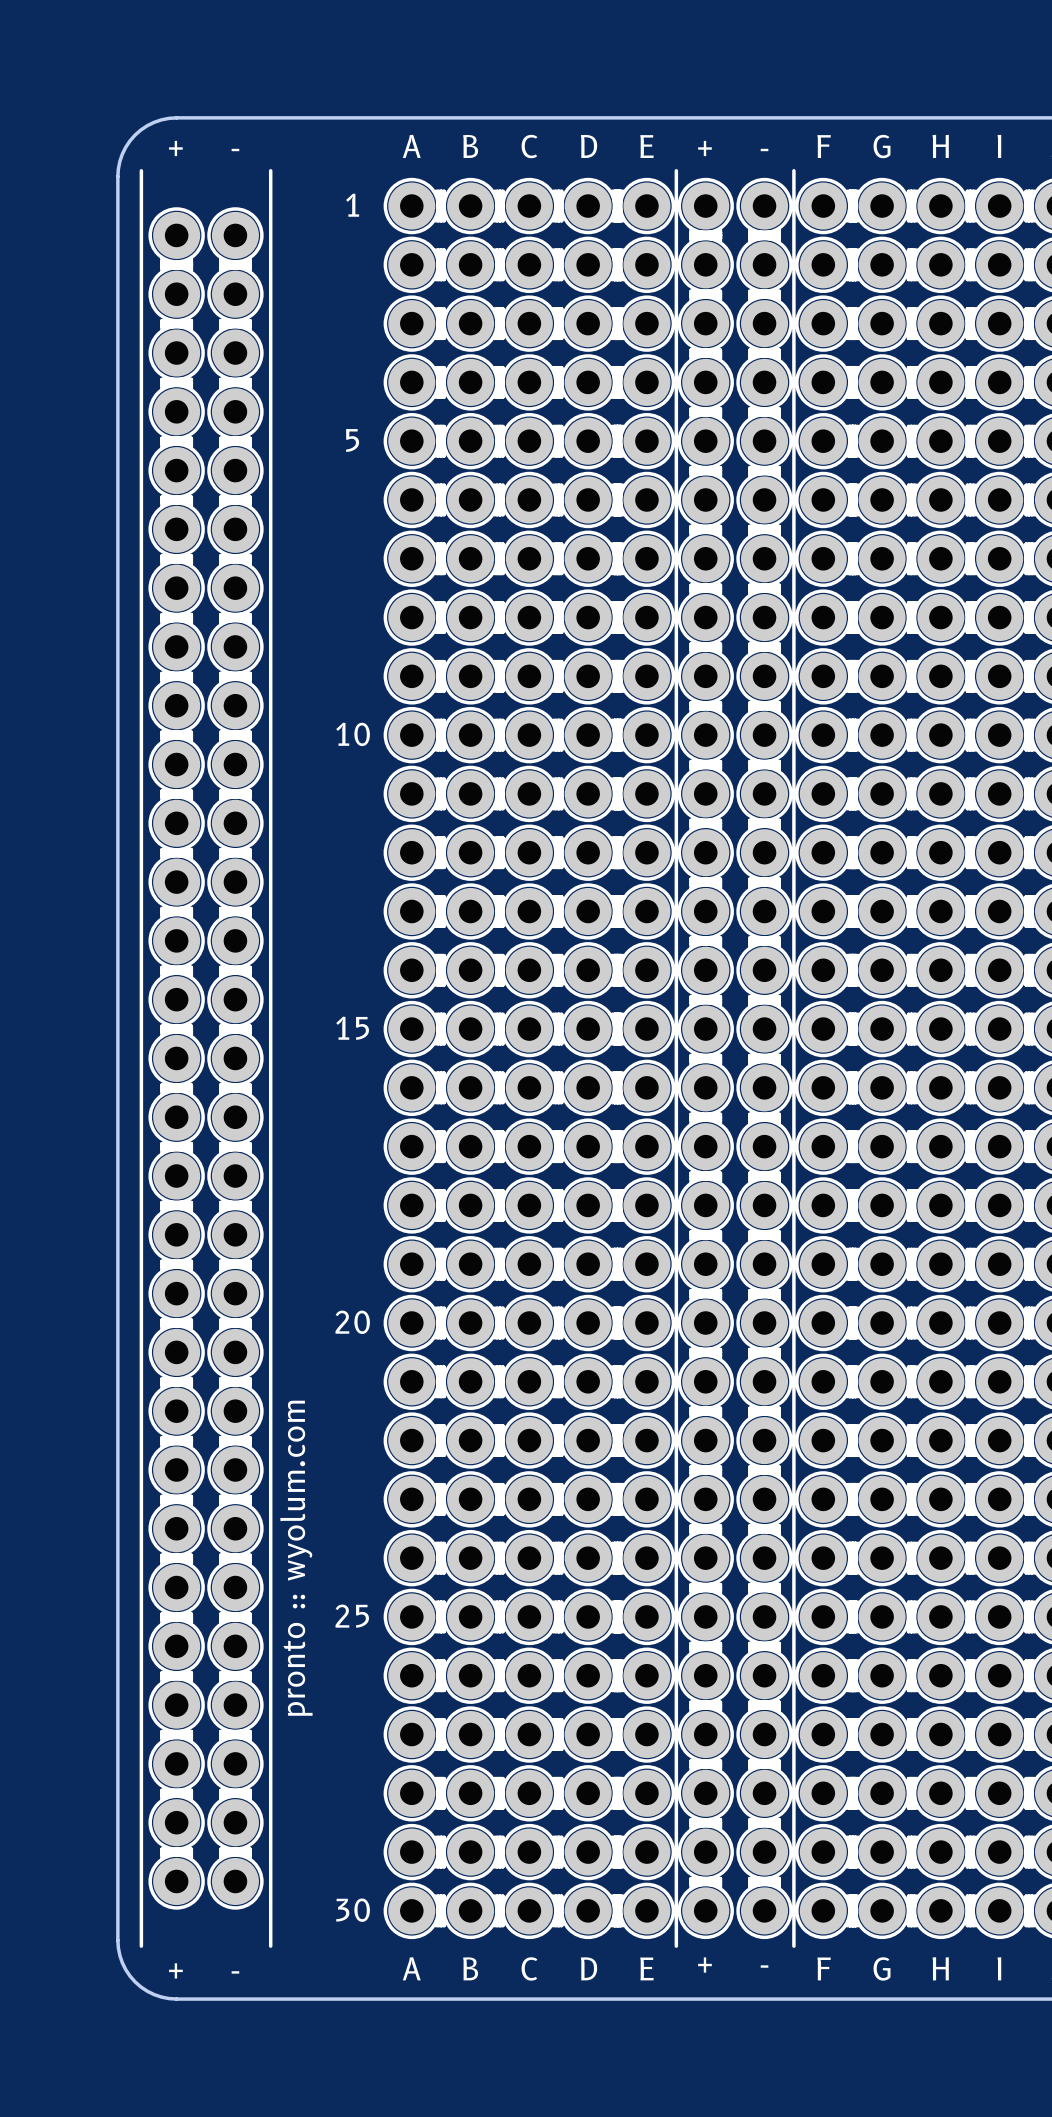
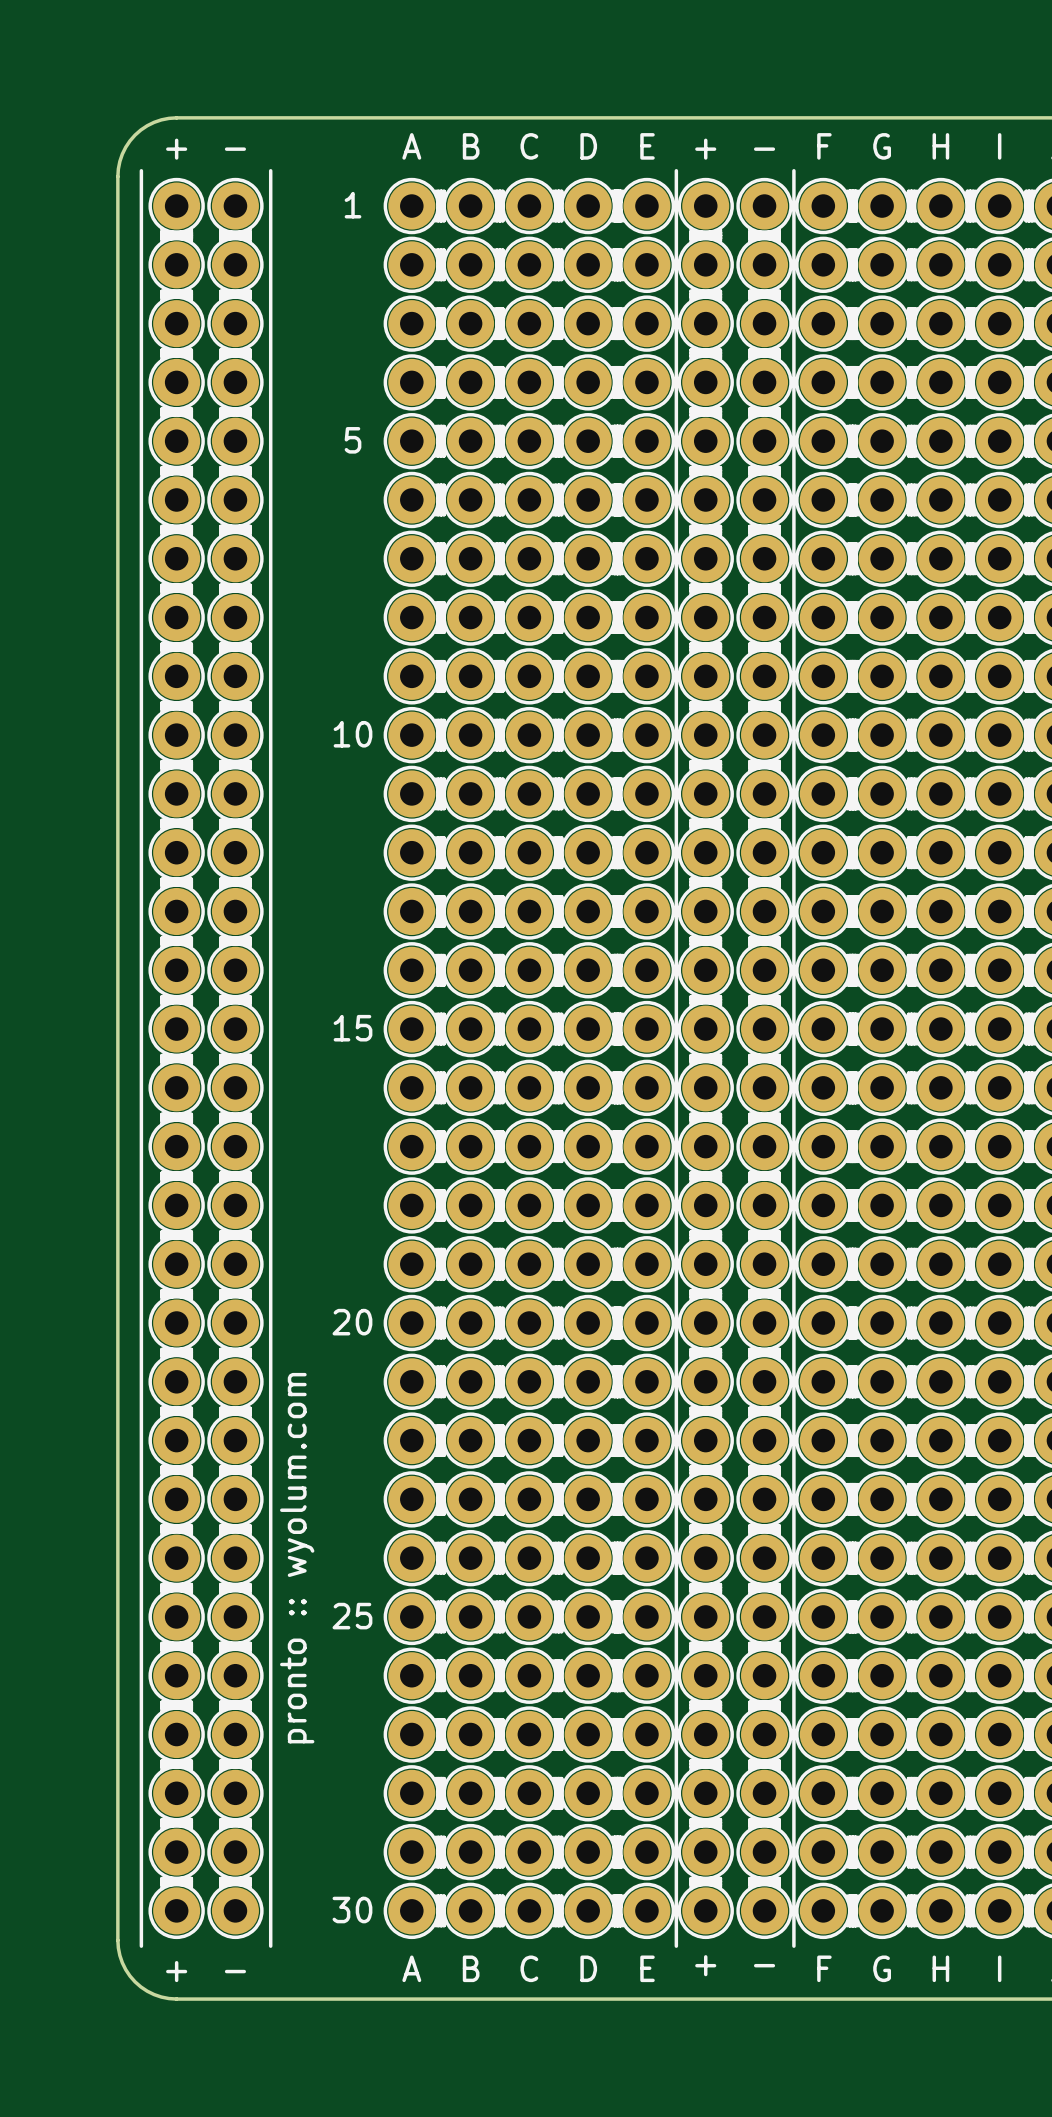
part: none -> (176, 208)
part: none -> (235, 208)
part: (176, 238) -> none
part: (235, 238) -> none
part: none -> (176, 261)
part: none -> (235, 261)
part: (176, 291) -> none
part: (235, 291) -> none
part: none -> (176, 320)
part: none -> (235, 320)
part: (176, 350) -> none
part: (235, 350) -> none
part: none -> (176, 379)
part: none -> (235, 379)
part: (176, 408) -> none
part: (235, 408) -> none
part: none -> (176, 438)
part: none -> (235, 438)
part: (176, 467) -> none
part: (235, 467) -> none
part: none -> (176, 497)
part: none -> (235, 497)
part: (176, 526) -> none
part: (235, 526) -> none
part: none -> (176, 555)
part: none -> (235, 555)
part: (176, 585) -> none
part: (235, 585) -> none
part: none -> (176, 614)
part: none -> (235, 614)
part: (176, 644) -> none
part: (235, 644) -> none
part: none -> (176, 673)
part: none -> (235, 673)
part: (176, 702) -> none
part: (235, 702) -> none
part: none -> (176, 732)
part: none -> (235, 732)
part: (176, 761) -> none
part: (235, 761) -> none
part: none -> (176, 790)
part: none -> (235, 790)
part: (176, 820) -> none
part: (235, 820) -> none
part: none -> (176, 849)
part: none -> (235, 849)
part: (176, 879) -> none
part: (235, 879) -> none
part: none -> (176, 908)
part: none -> (235, 908)
part: (176, 937) -> none
part: (235, 937) -> none
part: none -> (176, 967)
part: none -> (235, 967)
part: (176, 996) -> none
part: (235, 996) -> none
part: none -> (176, 1026)
part: none -> (235, 1026)
part: (176, 1055) -> none
part: (235, 1055) -> none
part: none -> (176, 1084)
part: none -> (235, 1084)
part: (176, 1114) -> none
part: (235, 1114) -> none
part: none -> (176, 1143)
part: none -> (235, 1143)
part: (176, 1173) -> none
part: (235, 1173) -> none
part: none -> (176, 1202)
part: none -> (235, 1202)
part: (176, 1231) -> none
part: (235, 1231) -> none
part: none -> (176, 1261)
part: none -> (235, 1261)
part: (176, 1290) -> none
part: (235, 1290) -> none
part: none -> (176, 1320)
part: none -> (235, 1320)
part: (176, 1349) -> none
part: (235, 1349) -> none
part: none -> (176, 1378)
part: none -> (235, 1378)
part: (176, 1408) -> none
part: (235, 1408) -> none
part: none -> (176, 1437)
part: none -> (235, 1437)
part: (176, 1467) -> none
part: (235, 1467) -> none
part: none -> (176, 1496)
part: none -> (235, 1496)
part: (176, 1525) -> none
part: (235, 1525) -> none
part: none -> (176, 1555)
part: none -> (235, 1555)
part: (176, 1584) -> none
part: (235, 1584) -> none
part: none -> (176, 1614)
part: none -> (235, 1614)
part: (176, 1643) -> none
part: (235, 1643) -> none
part: none -> (176, 1672)
part: none -> (235, 1672)
part: (176, 1702) -> none
part: (235, 1702) -> none
part: none -> (176, 1731)
part: none -> (235, 1731)
part: (176, 1760) -> none
part: (235, 1760) -> none
part: none -> (176, 1790)
part: none -> (235, 1790)
part: (176, 1819) -> none
part: (235, 1819) -> none
part: none -> (176, 1849)
part: none -> (235, 1849)
part: (176, 1878) -> none
part: (235, 1878) -> none
part: none -> (176, 1907)
part: none -> (235, 1907)

